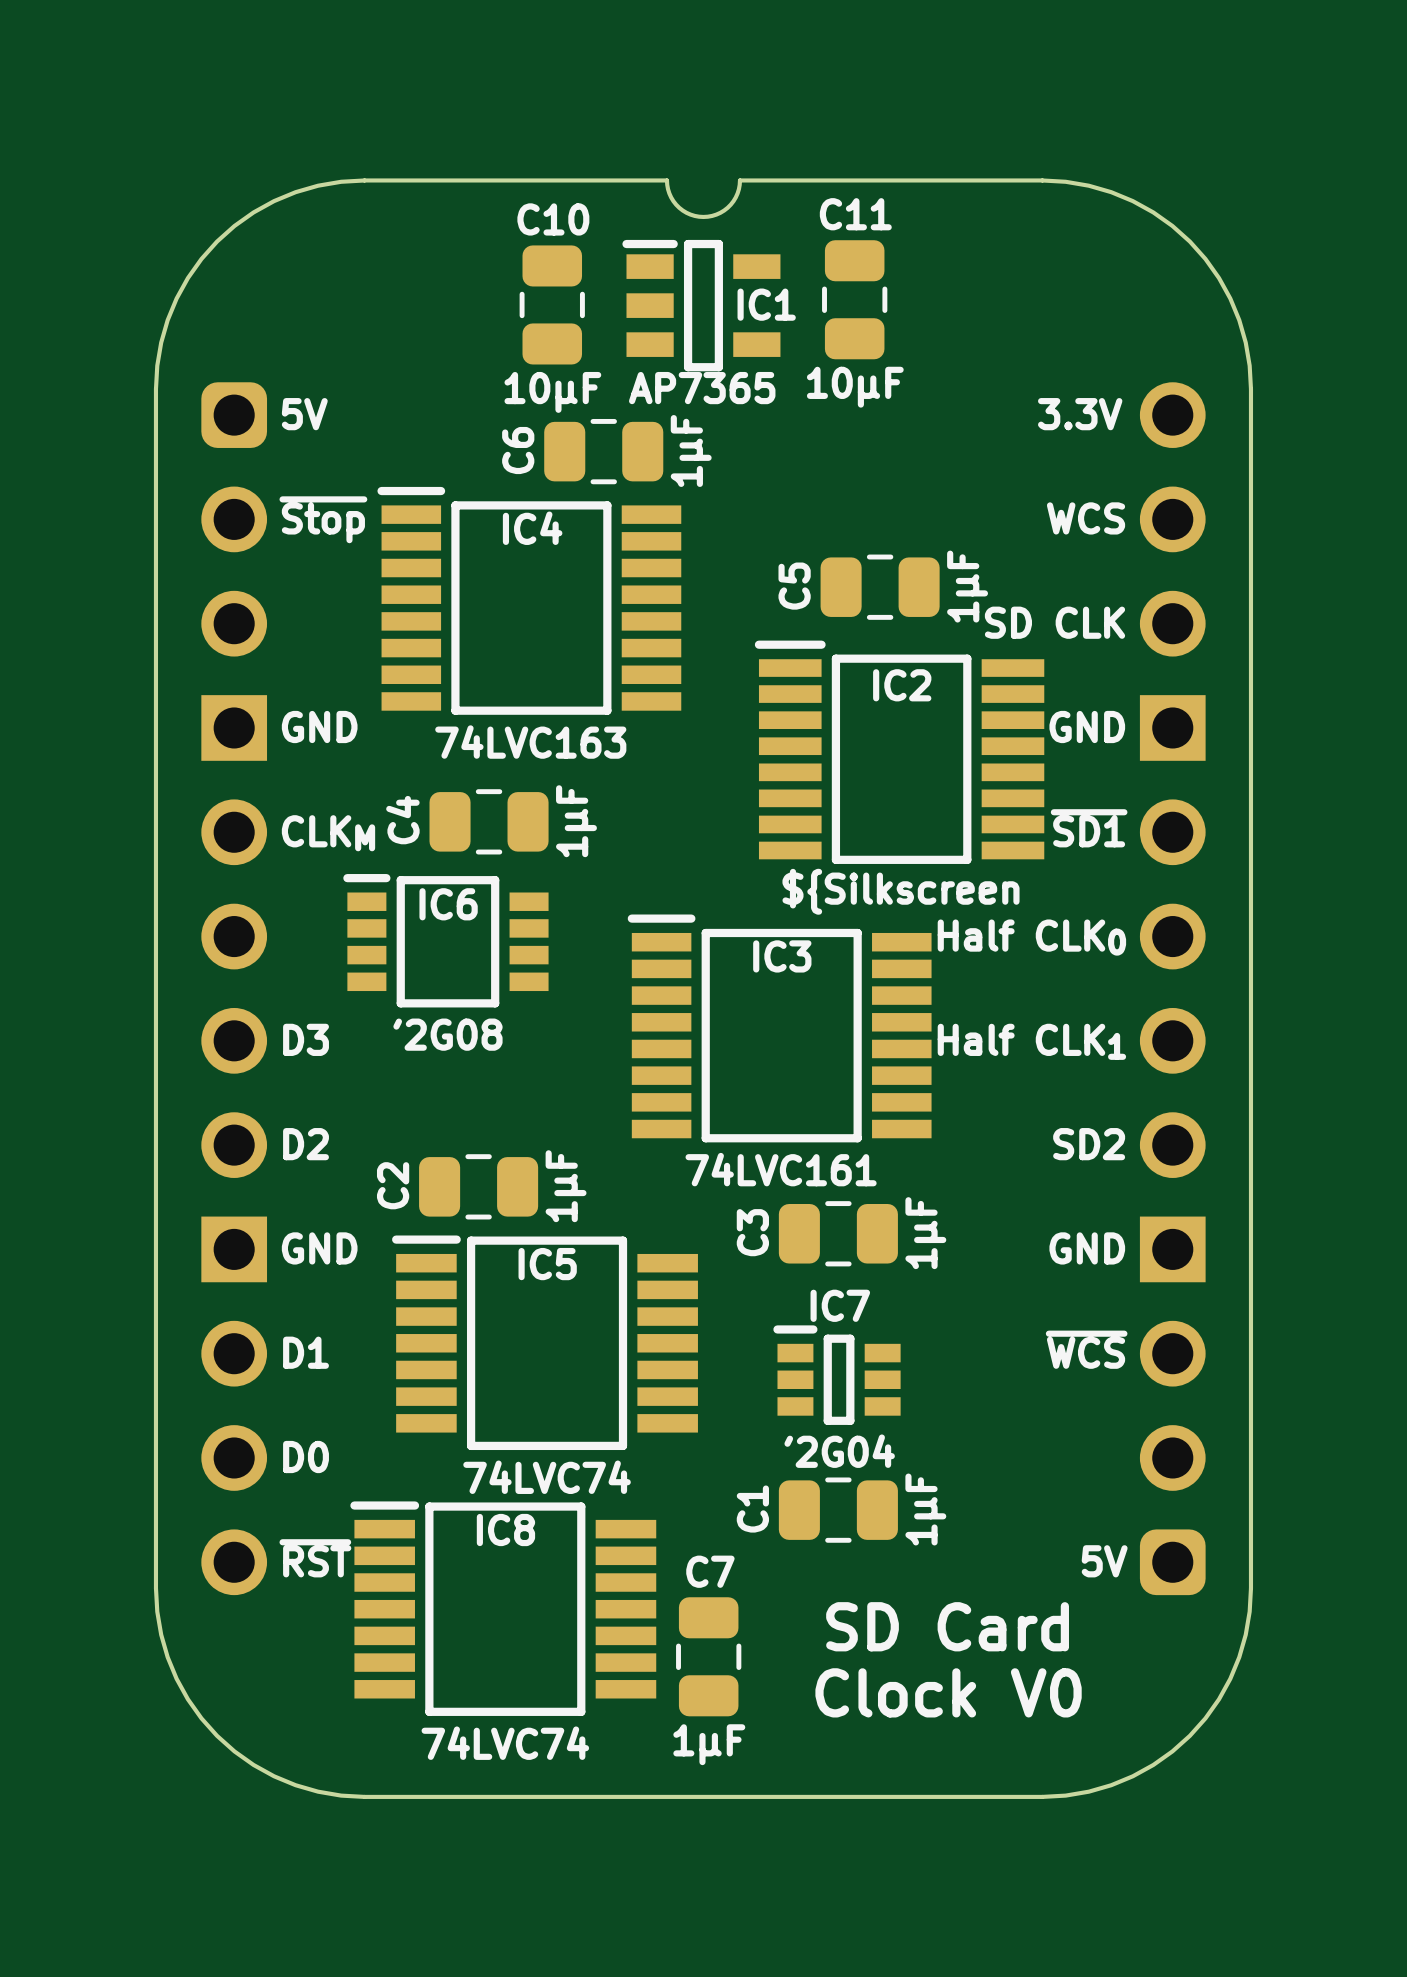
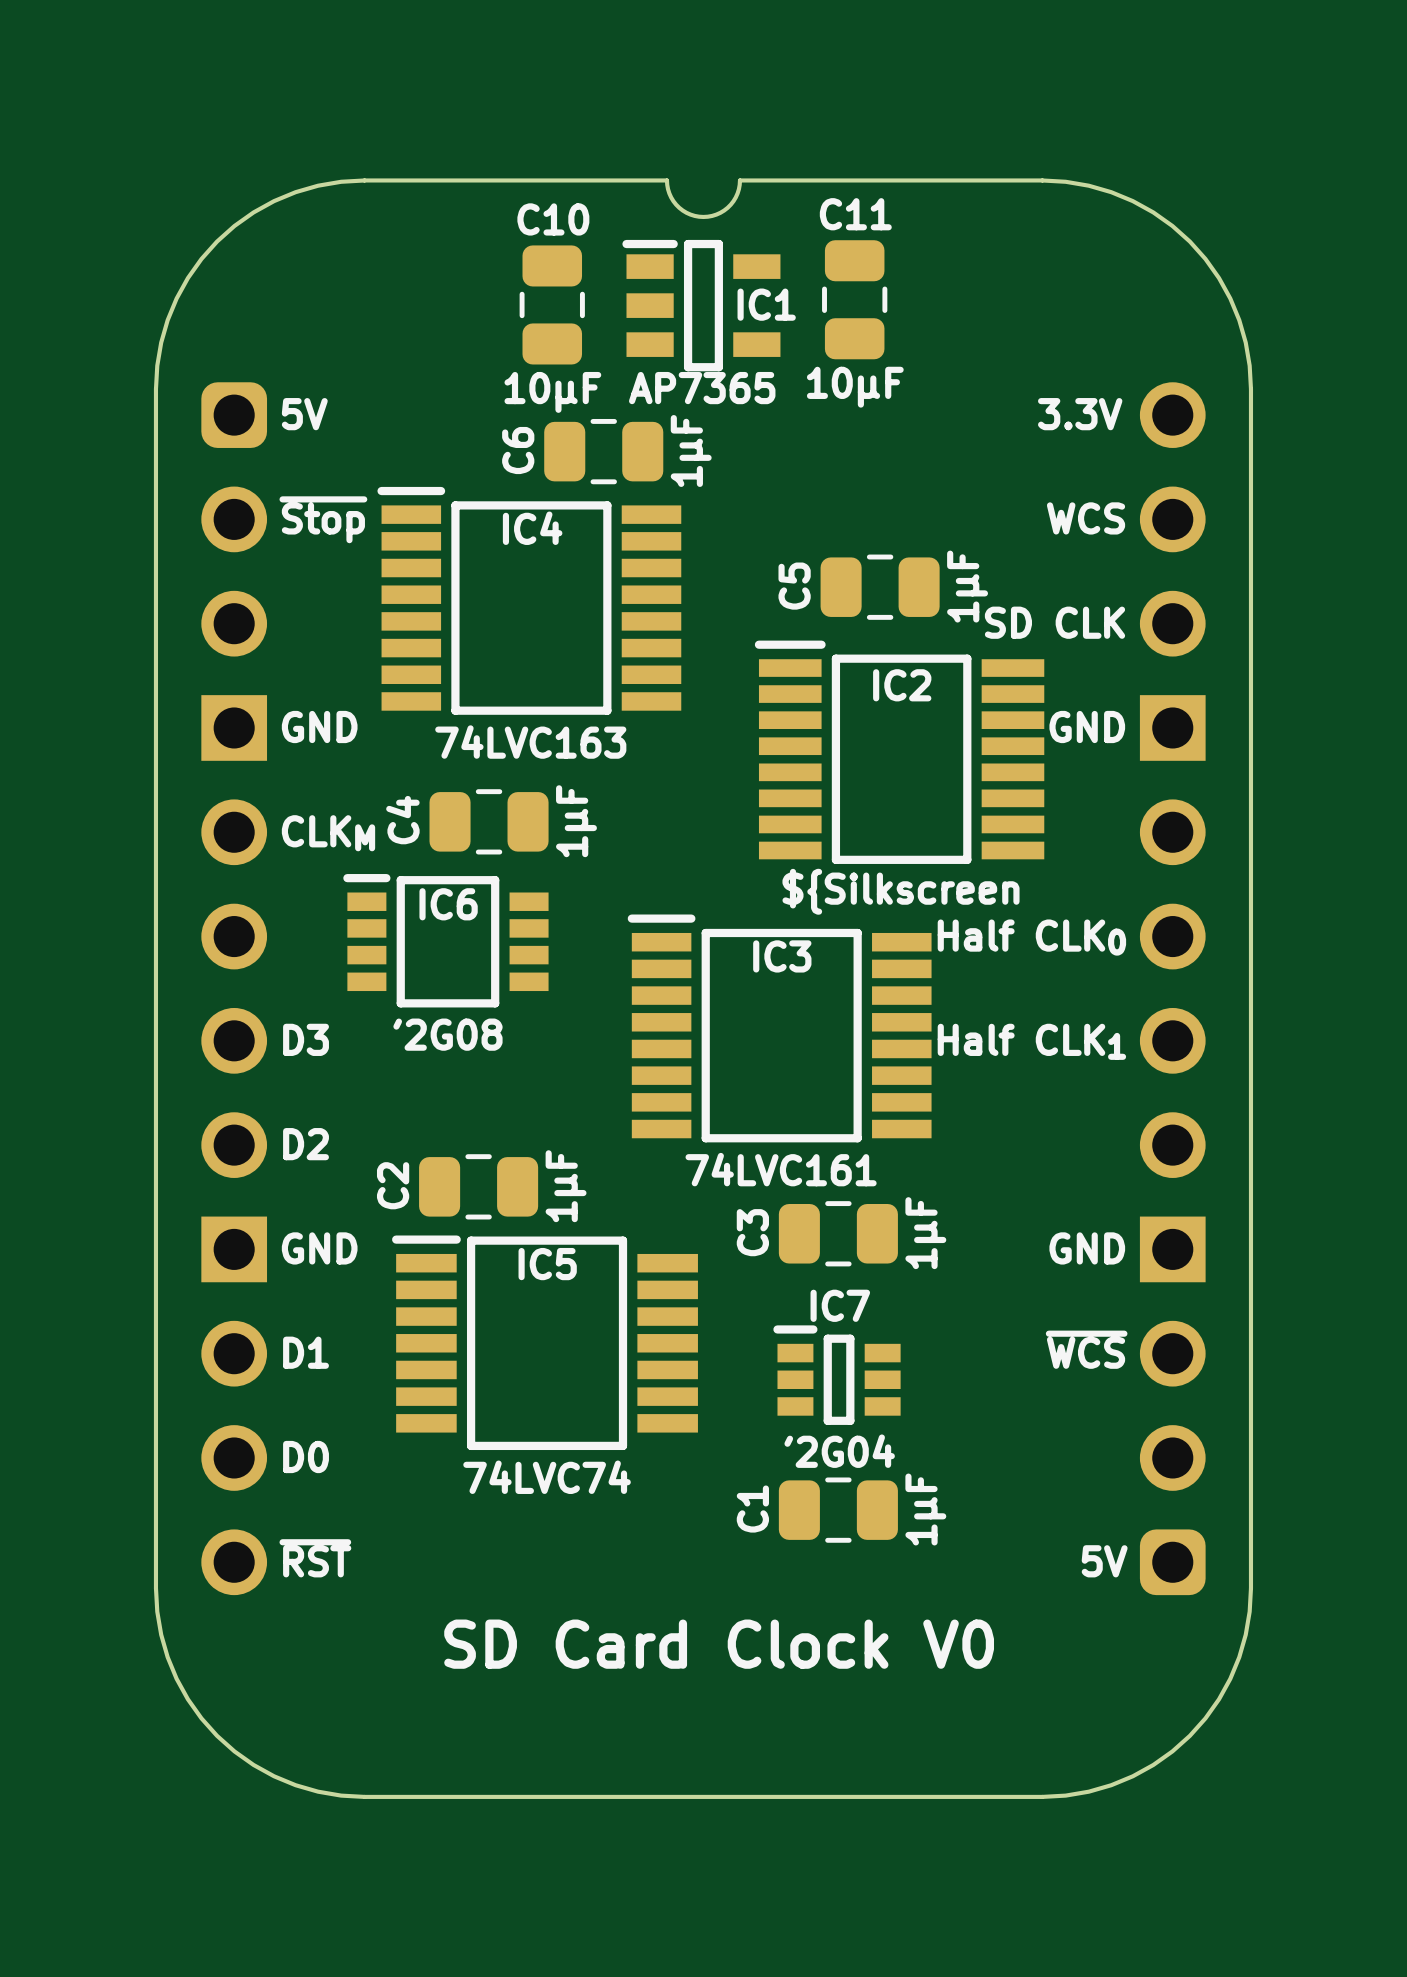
text: ~{SD1} (1089, 828) -> none
text: SD2 (1089, 1144) -> none
IC8: (503, 1608) -> none
text: SD Card (947, 1626) -> none
text: none -> SD Card Clock V0 (719, 1644)
C7: 1μF (708, 1656) -> none
text: Clock V0 (948, 1692) -> none

